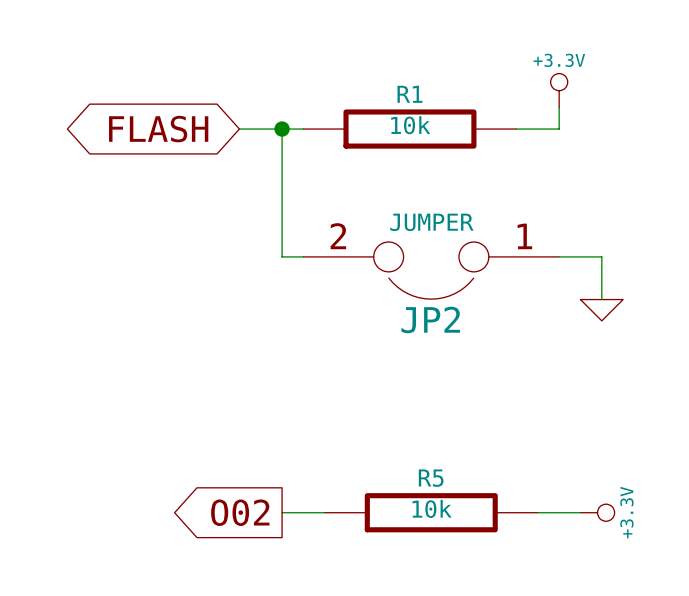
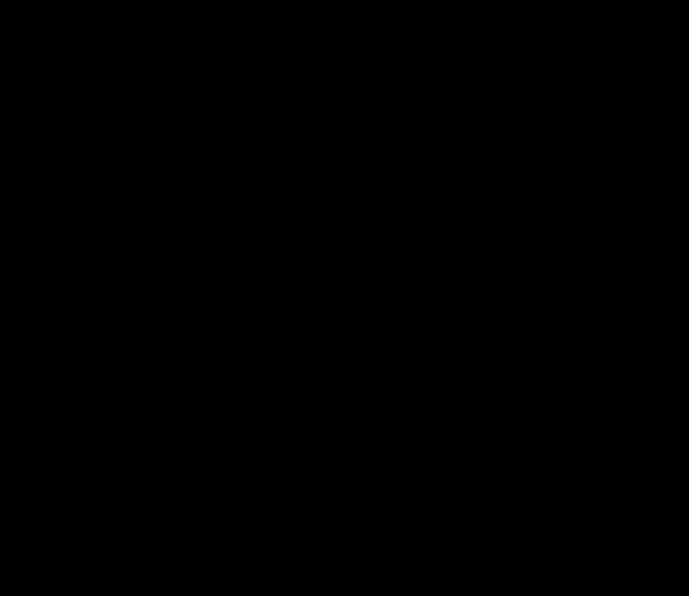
power symbol: +3.3V (559, 90) -> none
wire: (559, 107) (559, 129) (516, 129) -> none
global label: FLASH (158, 129) -> none
wire: (239, 129) (303, 129) -> none
wire: (282, 129) (282, 256) (303, 256) -> none
junction: (282, 129) -> none
R1: 10k (409, 129) -> none
wire: (559, 256) (601, 256) (601, 299) -> none
JP2: JUMPER (431, 270) -> none
power symbol: (601, 310) -> none
global label: O02 (240, 512) -> none
wire: (282, 512) (324, 512) -> none
R5: 10k (431, 512) -> none
wire: (537, 512) (580, 512) -> none
power symbol: +3.3V (597, 512) -> none

